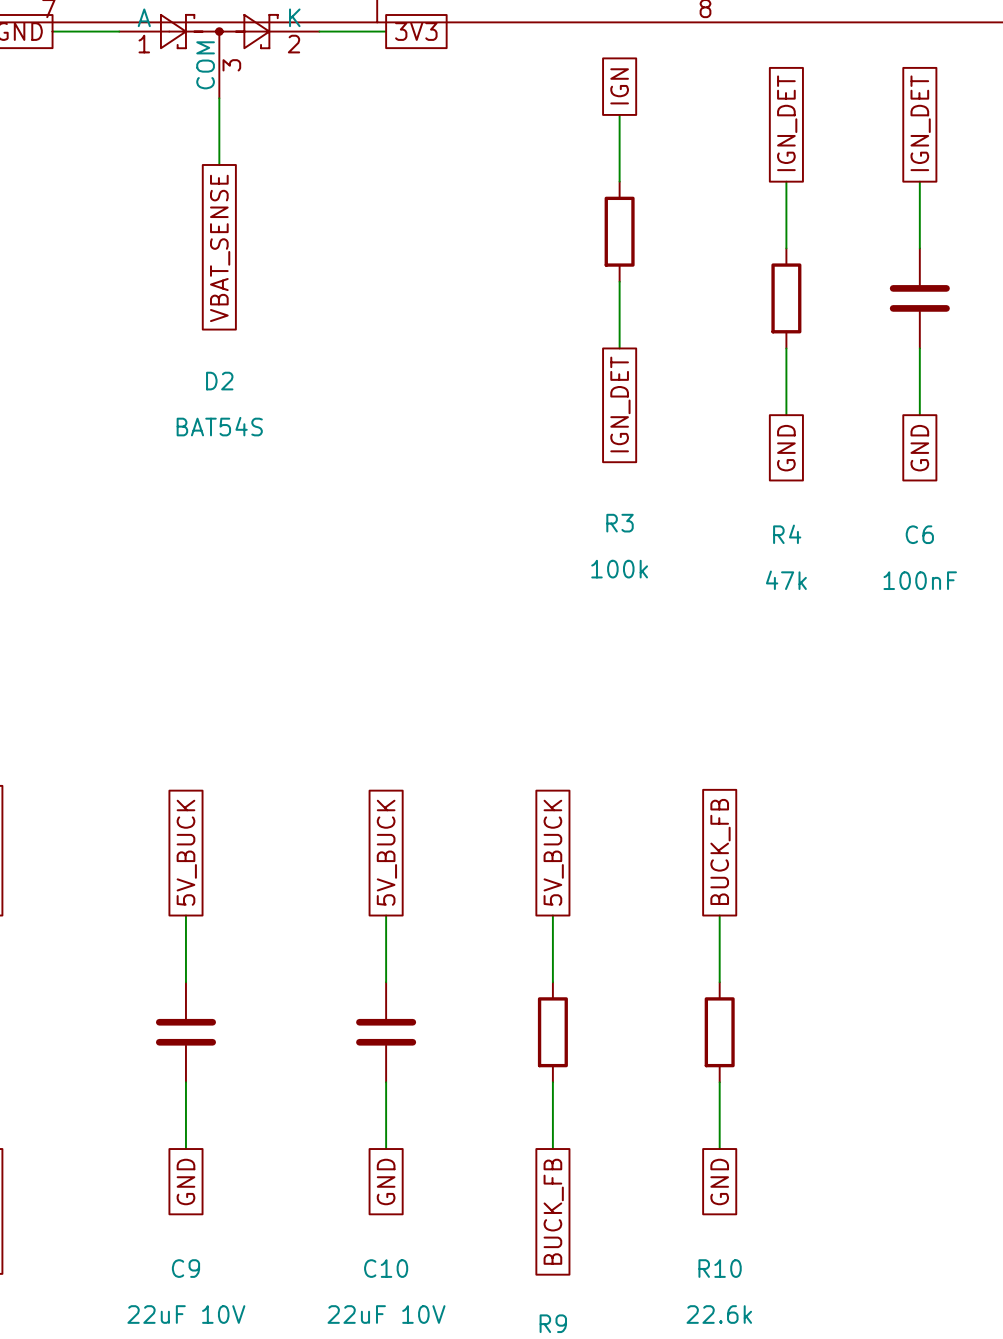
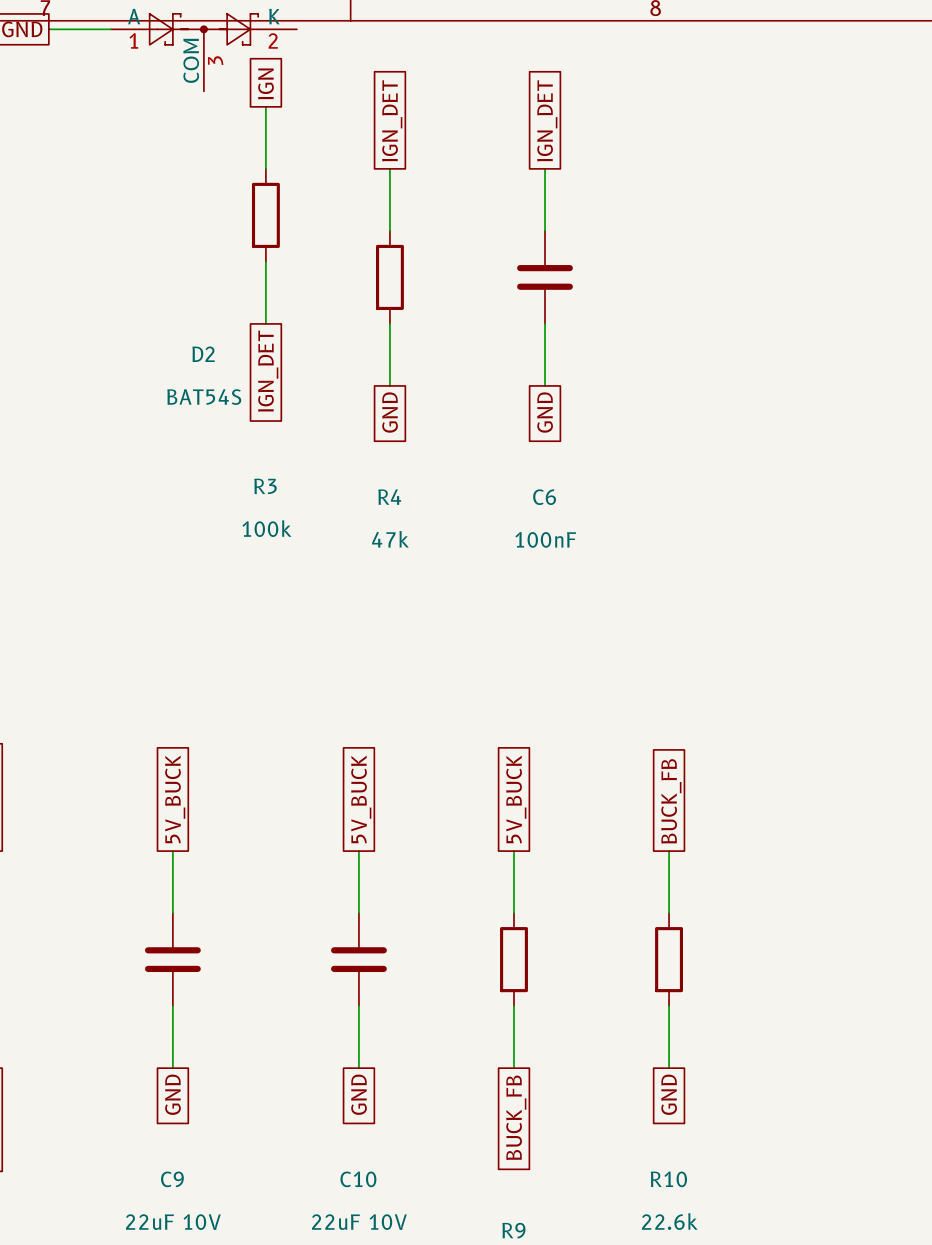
wire: (319, 31) (386, 31) -> none
global label: 3V3 (416, 31) -> none
global label: none -> IGN (266, 83)
global label: IGN (619, 86) -> none
wire: (219, 98) (219, 164) -> (265, 106) (265, 168)
wire: (619, 114) (619, 181) -> (545, 168) (545, 230)
global label: none -> IGN_DET (392, 120)
global label: none -> IGN_DET (547, 120)
global label: IGN_DET (787, 123) -> none
global label: IGN_DET (920, 123) -> none
wire: none -> (389, 168) (389, 230)
wire: (786, 181) (786, 248) -> none
wire: (919, 181) (919, 248) -> none
R3 position: (619, 231) -> (265, 215)
global label: VBAT_SENSE (220, 248) -> none
wire: none -> (265, 261) (265, 323)
wire: (619, 281) (619, 348) -> (545, 323) (545, 385)
R4 position: (786, 298) -> (389, 277)
C6 position: (919, 298) -> (545, 277)
wire: none -> (389, 323) (389, 385)
wire: (786, 348) (786, 415) -> none
wire: (919, 348) (919, 415) -> none
global label: none -> IGN_DET (268, 371)
global label: IGN_DET (620, 404) -> none
global label: none -> GND (390, 412)
global label: none -> GND (545, 412)
global label: GND (786, 448) -> none
global label: GND (919, 448) -> none

